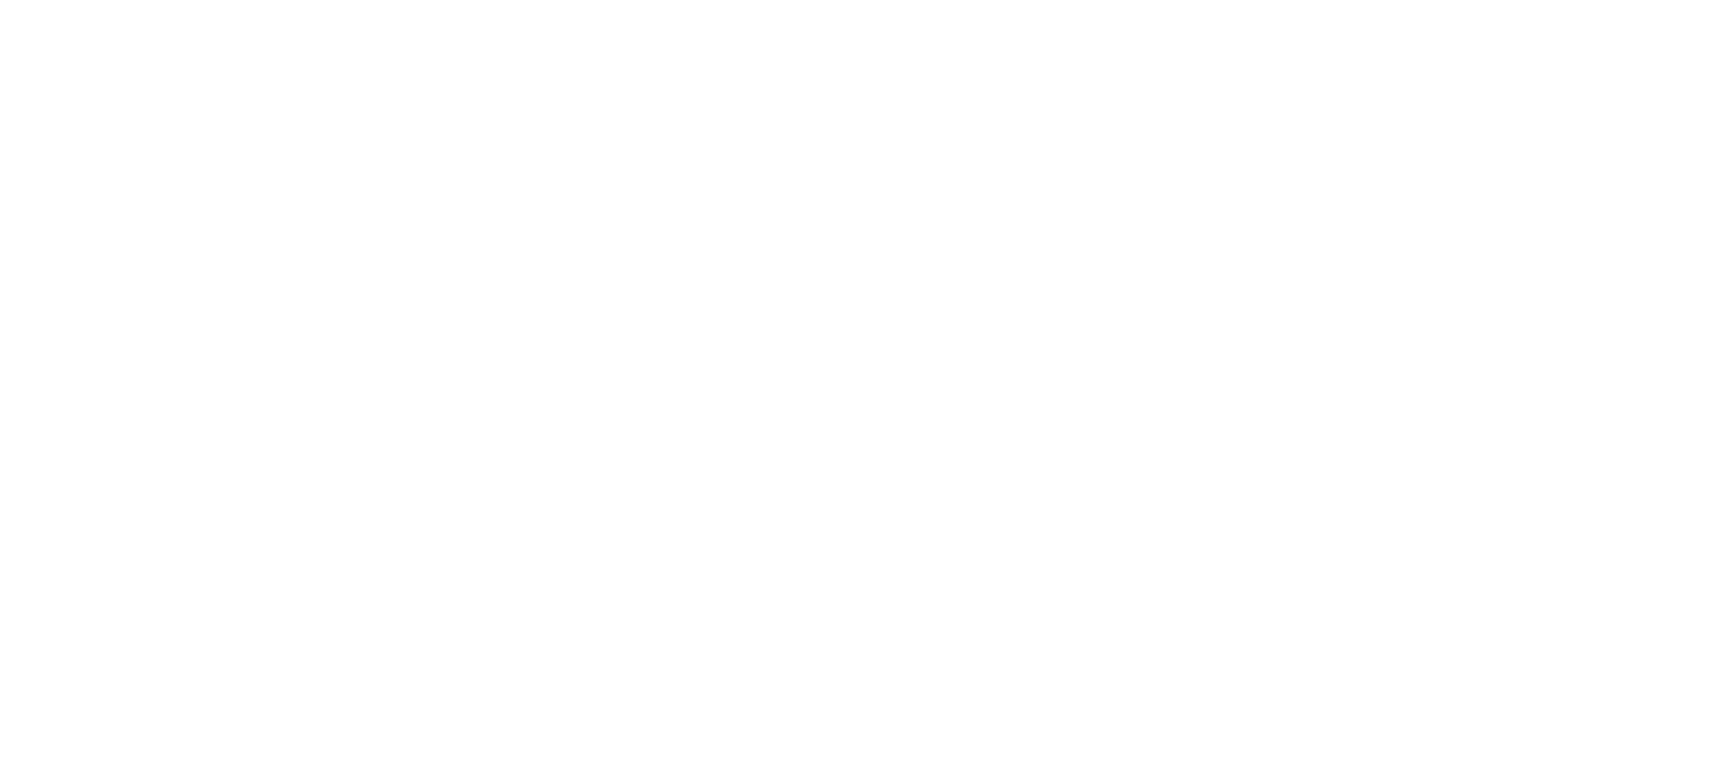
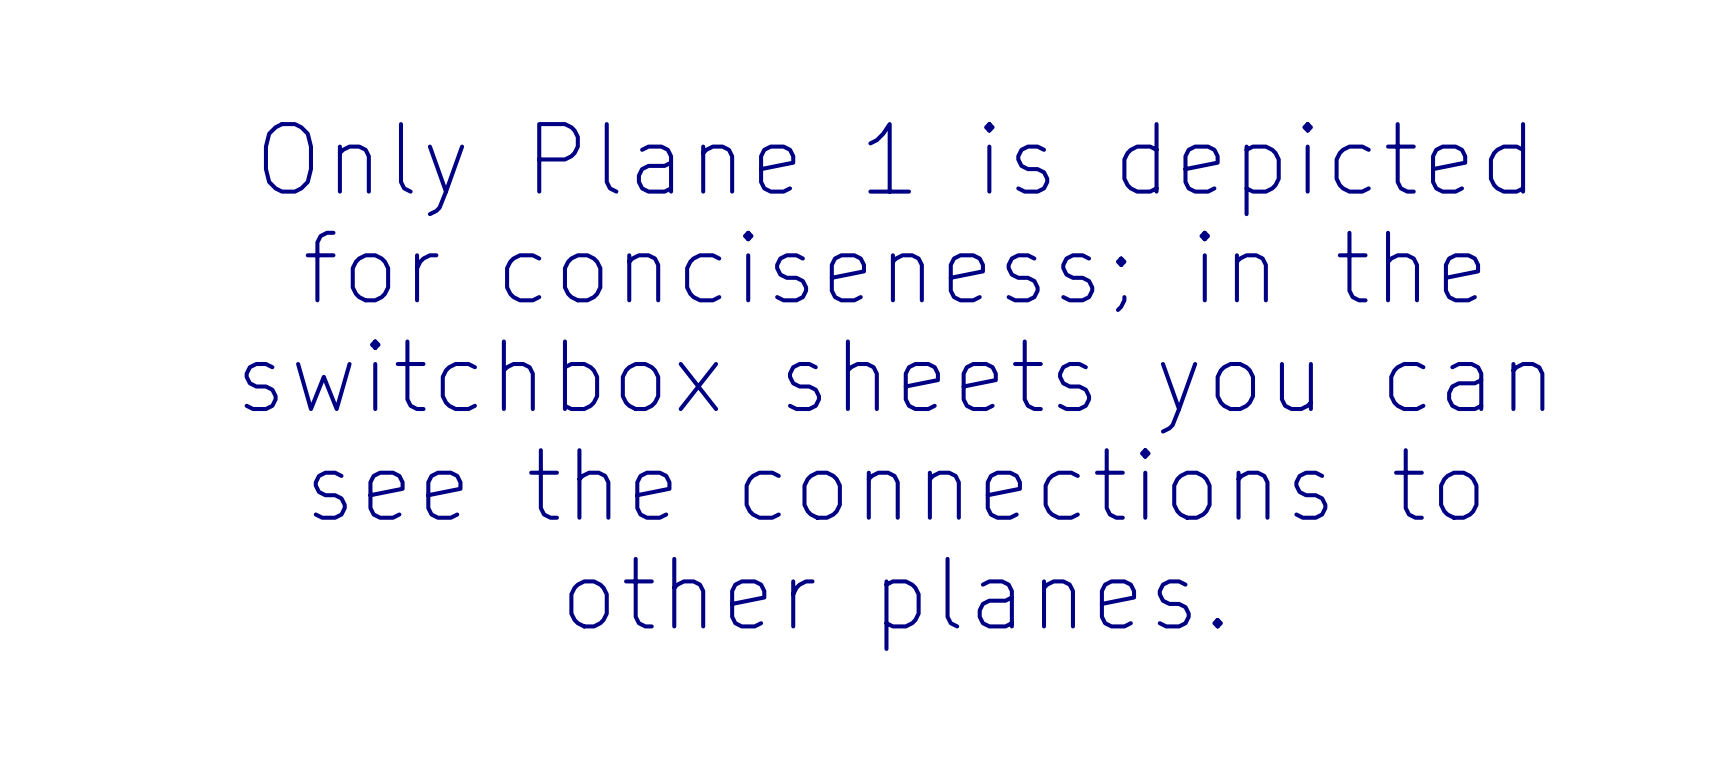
text: none -> Only Plane 1 is depicted (894, 169)
text: none -> for conciseness; in the (892, 271)
text: none -> switchbox sheets you can (894, 386)
text: none -> see the connections to (896, 483)
text: none -> other planes. (896, 603)

